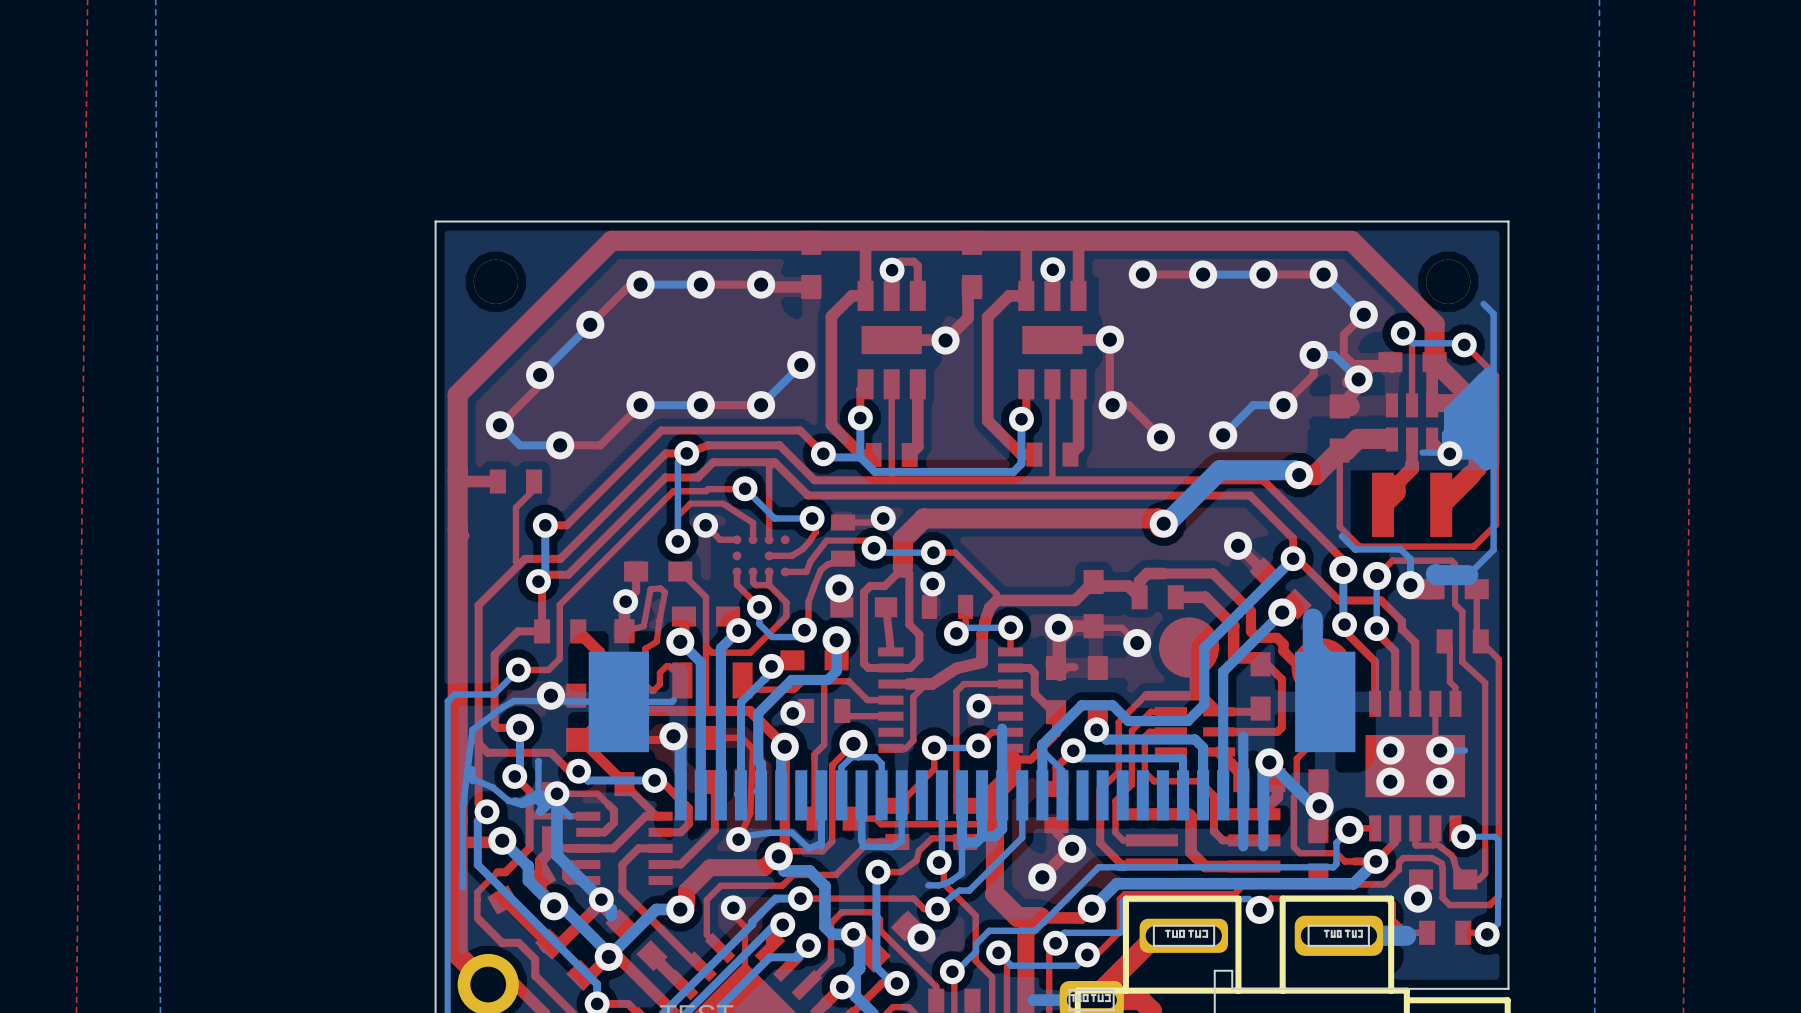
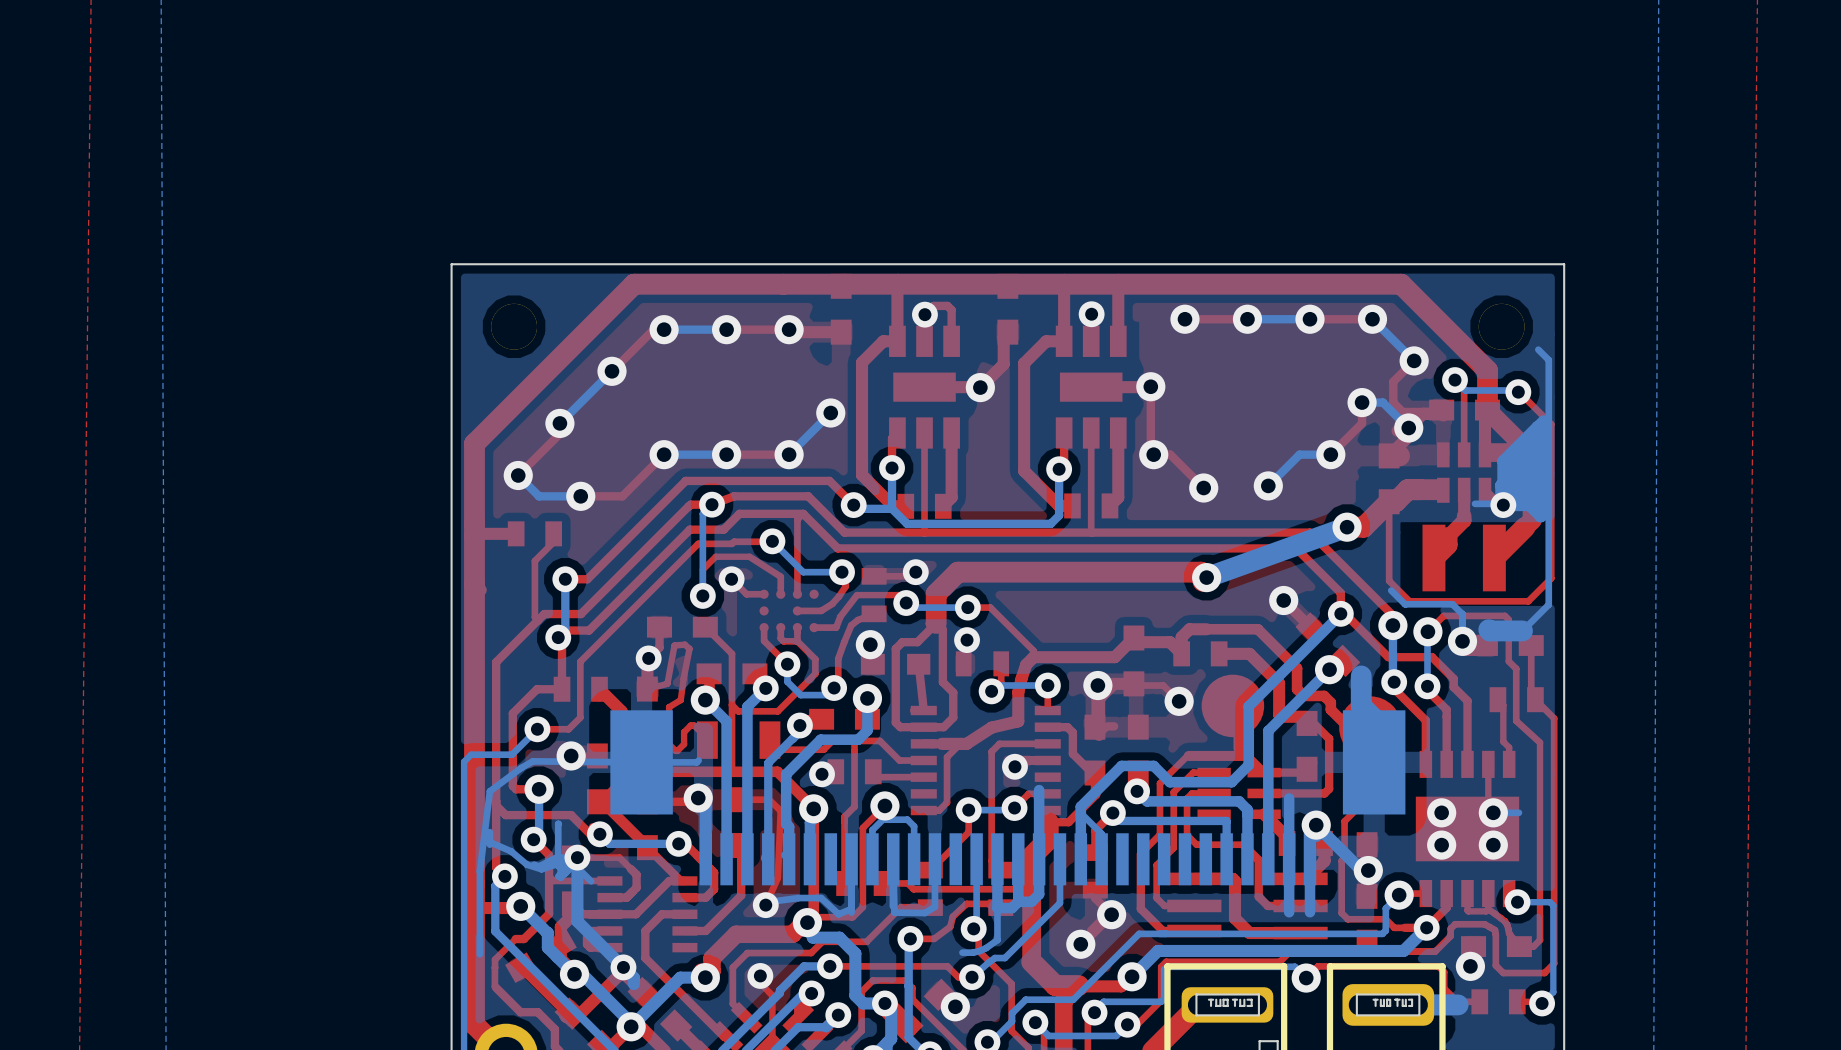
bottom track: (1299, 475) (1294, 470) (1219, 470) (1166, 523) -> (1347, 527) (1206, 577)

